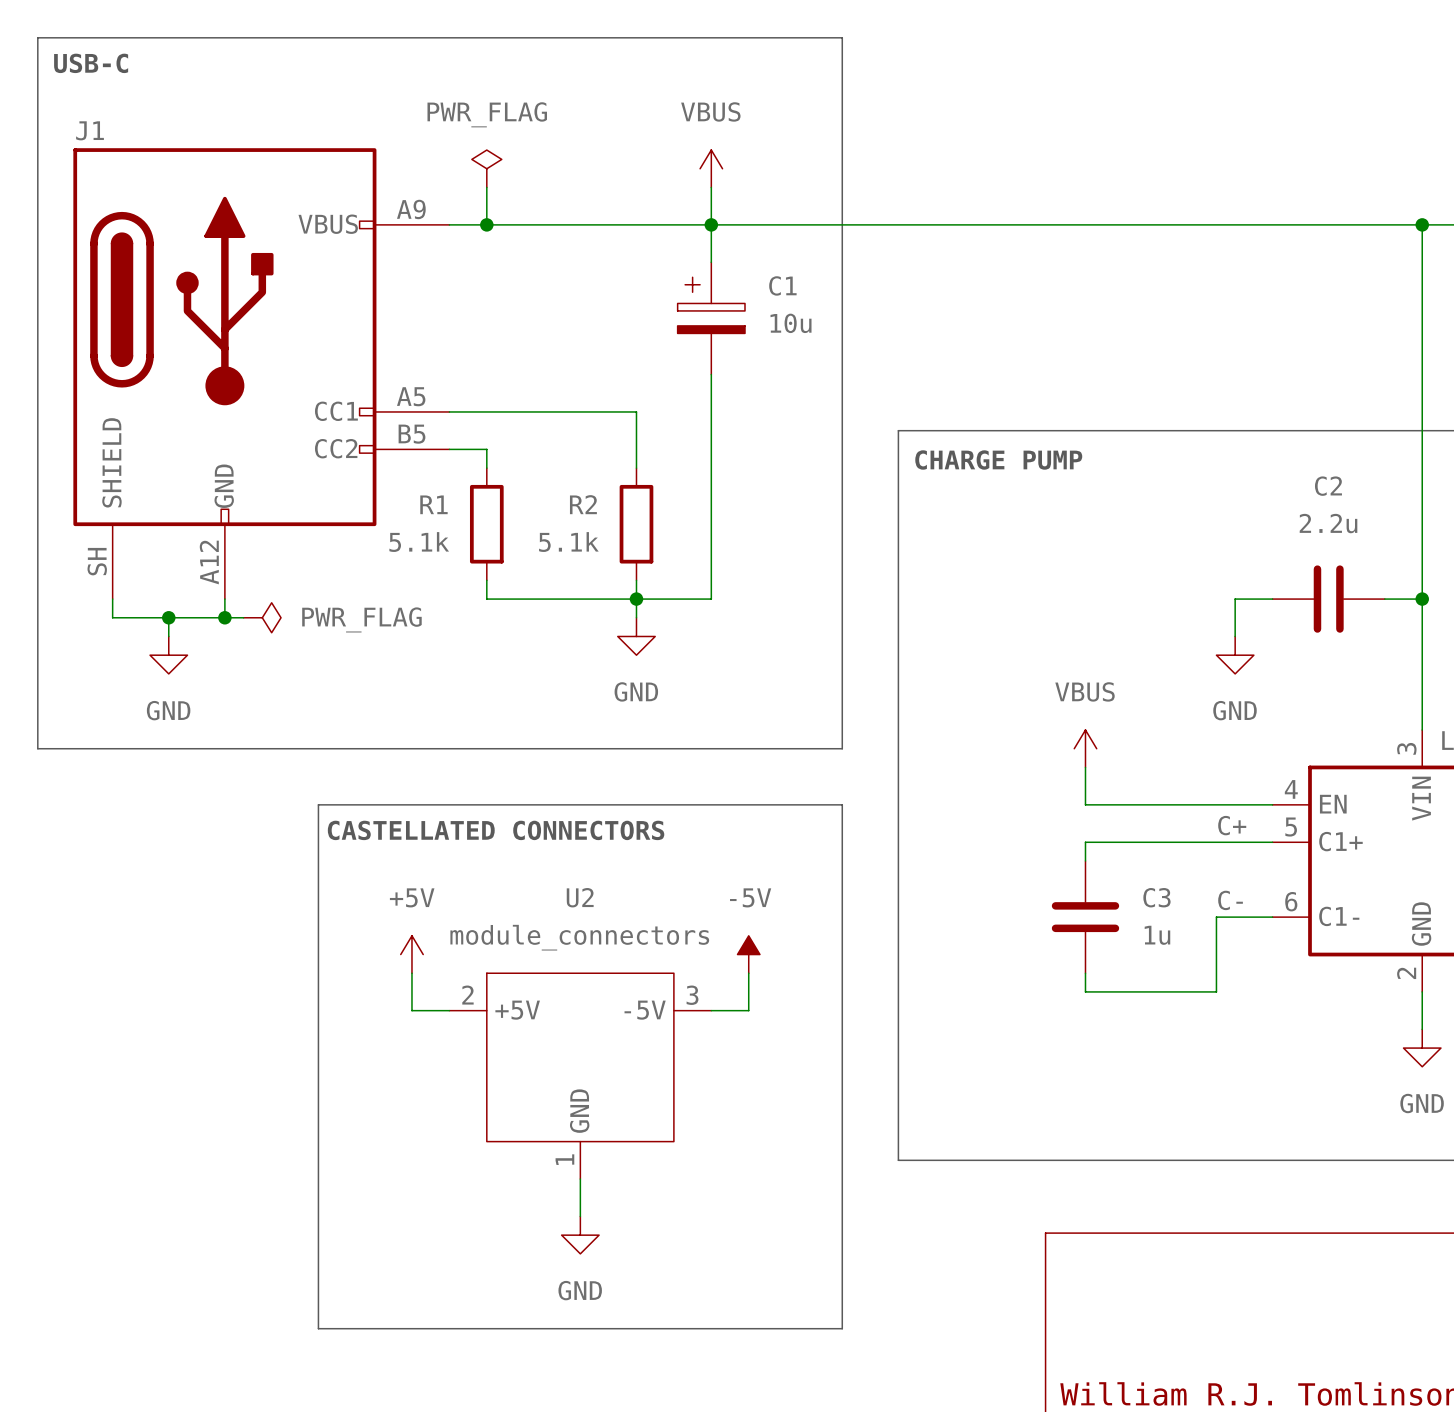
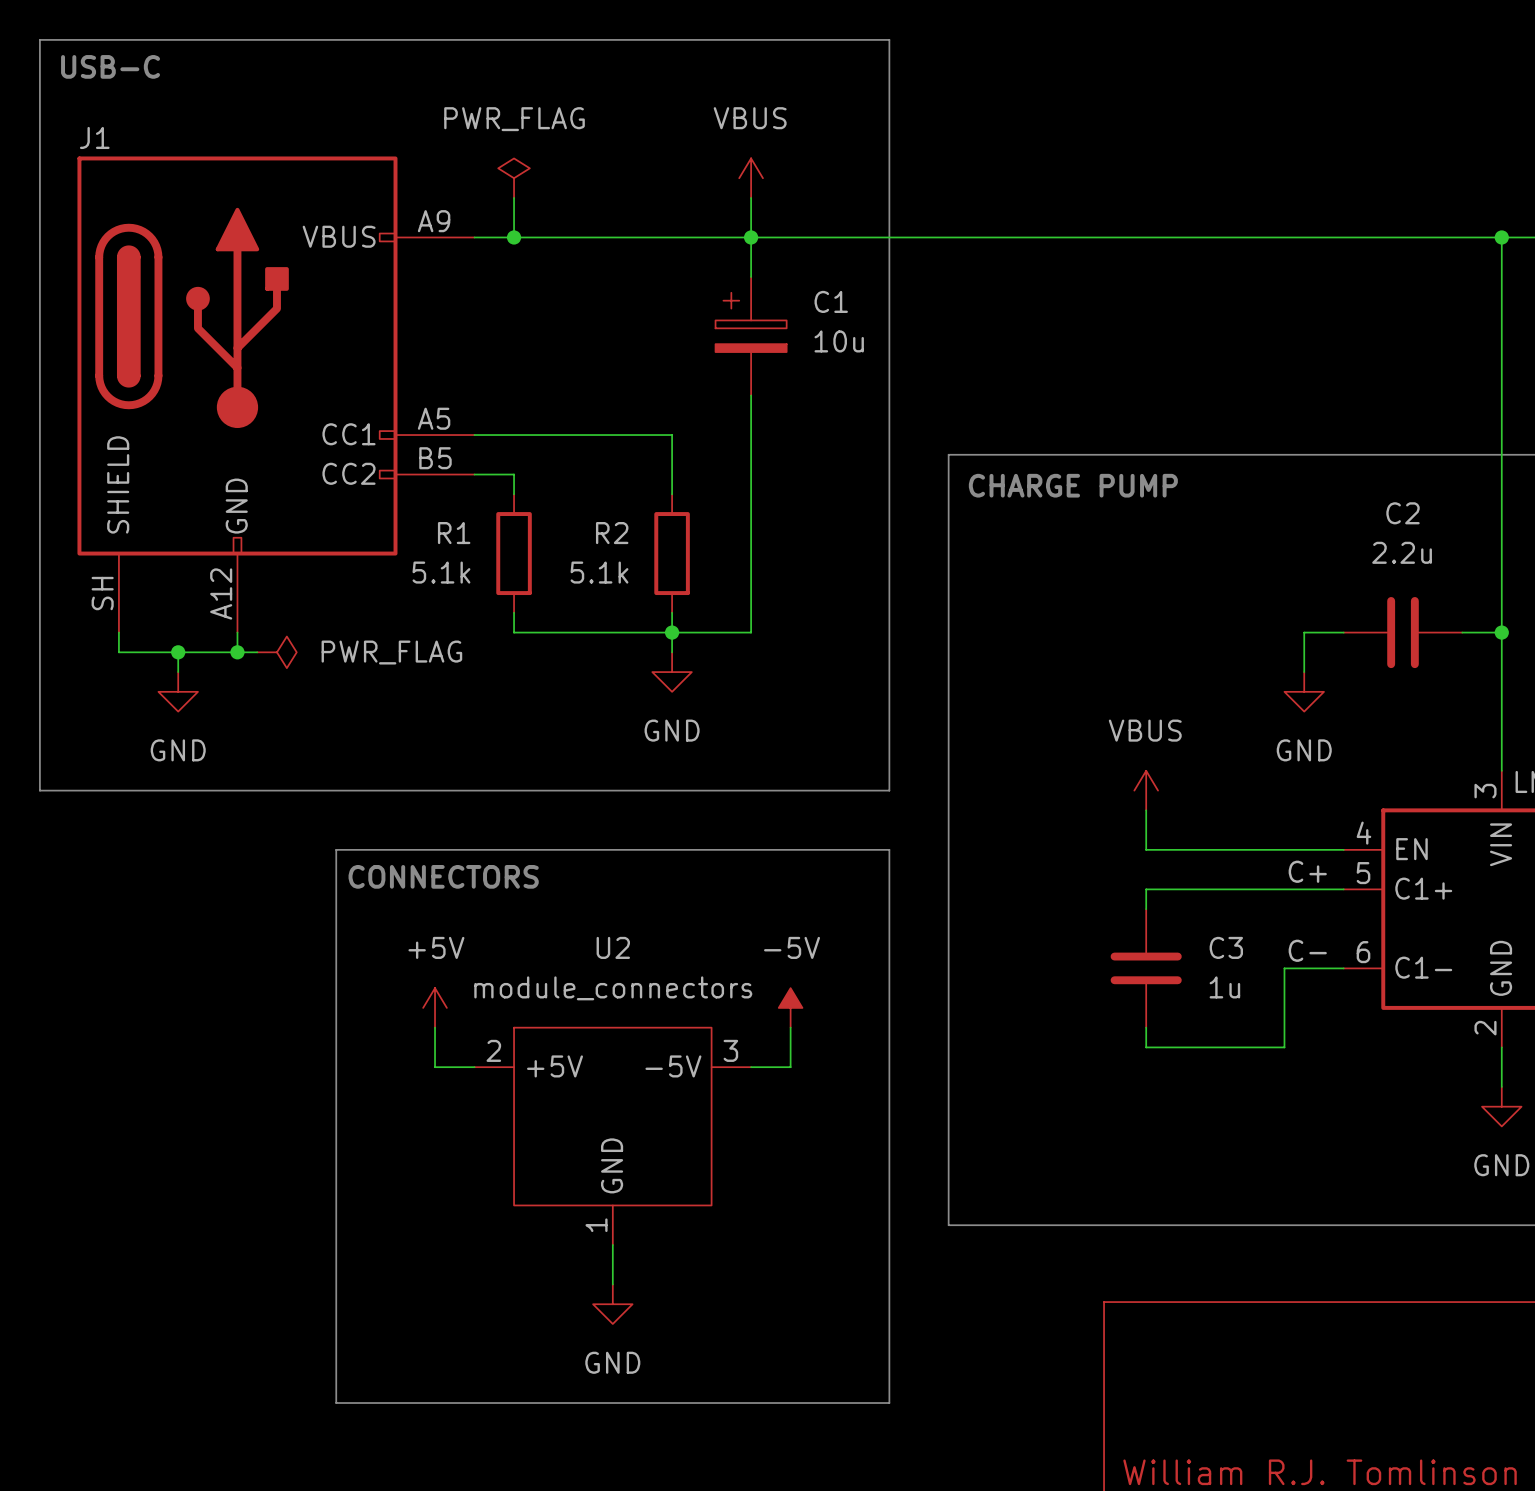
text: CASTELLATED CONNECTORS (496, 830) -> CONNECTORS (443, 876)

